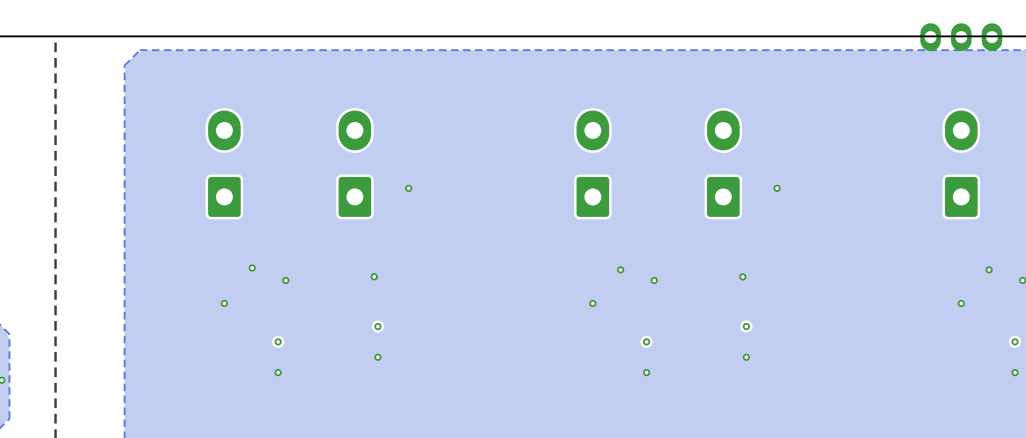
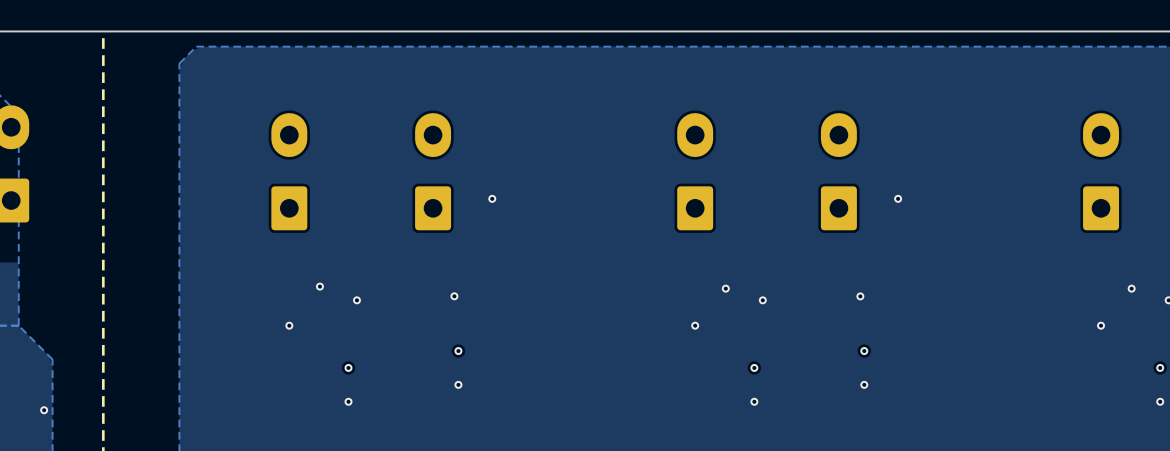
part: (961, 37) -> none

